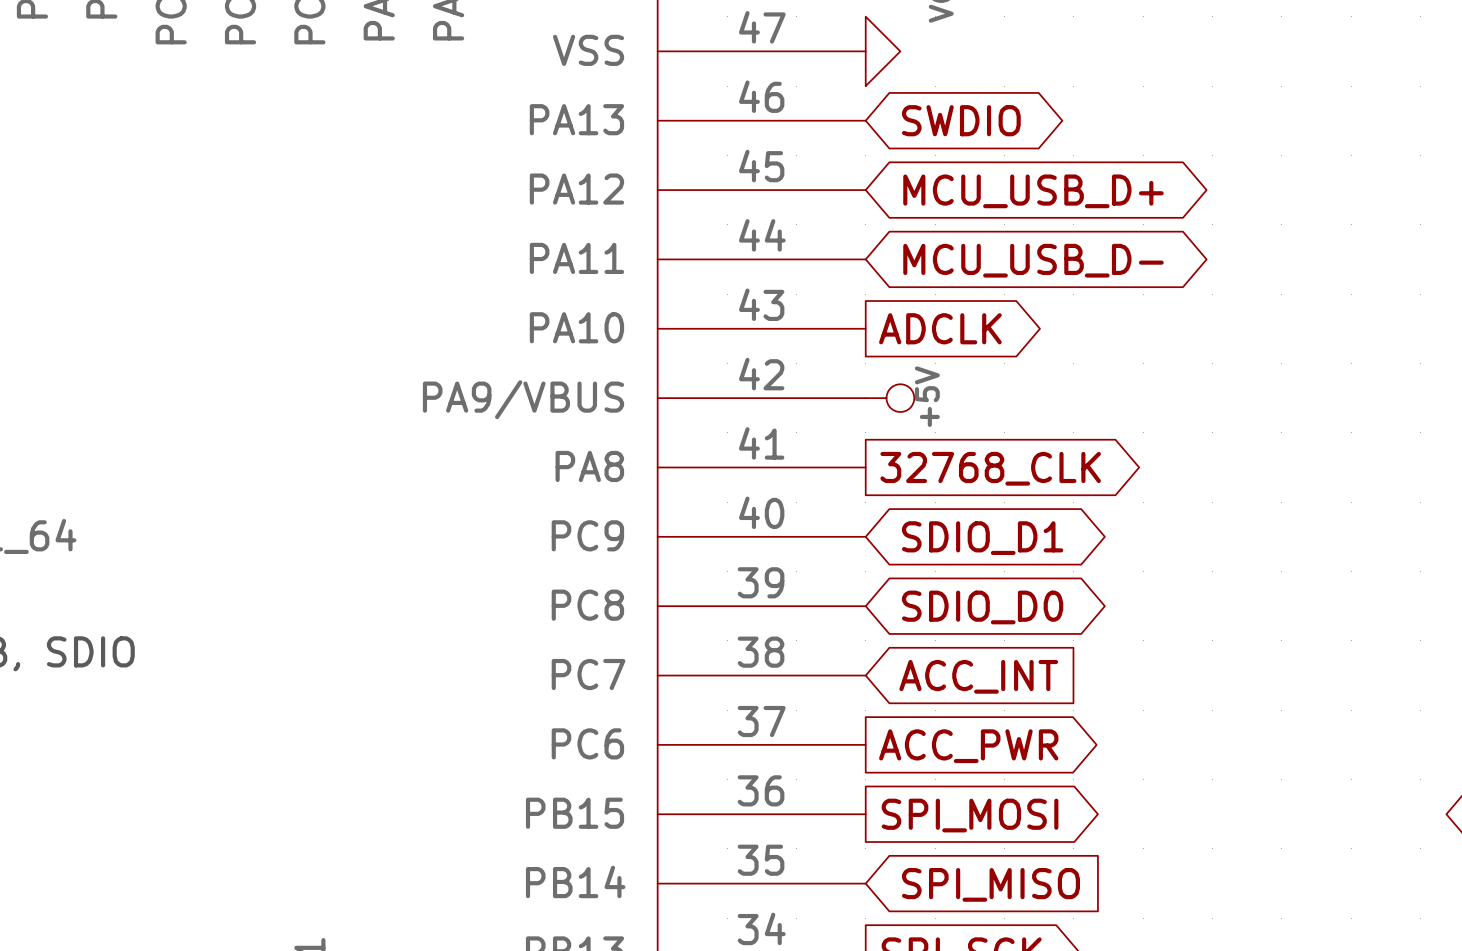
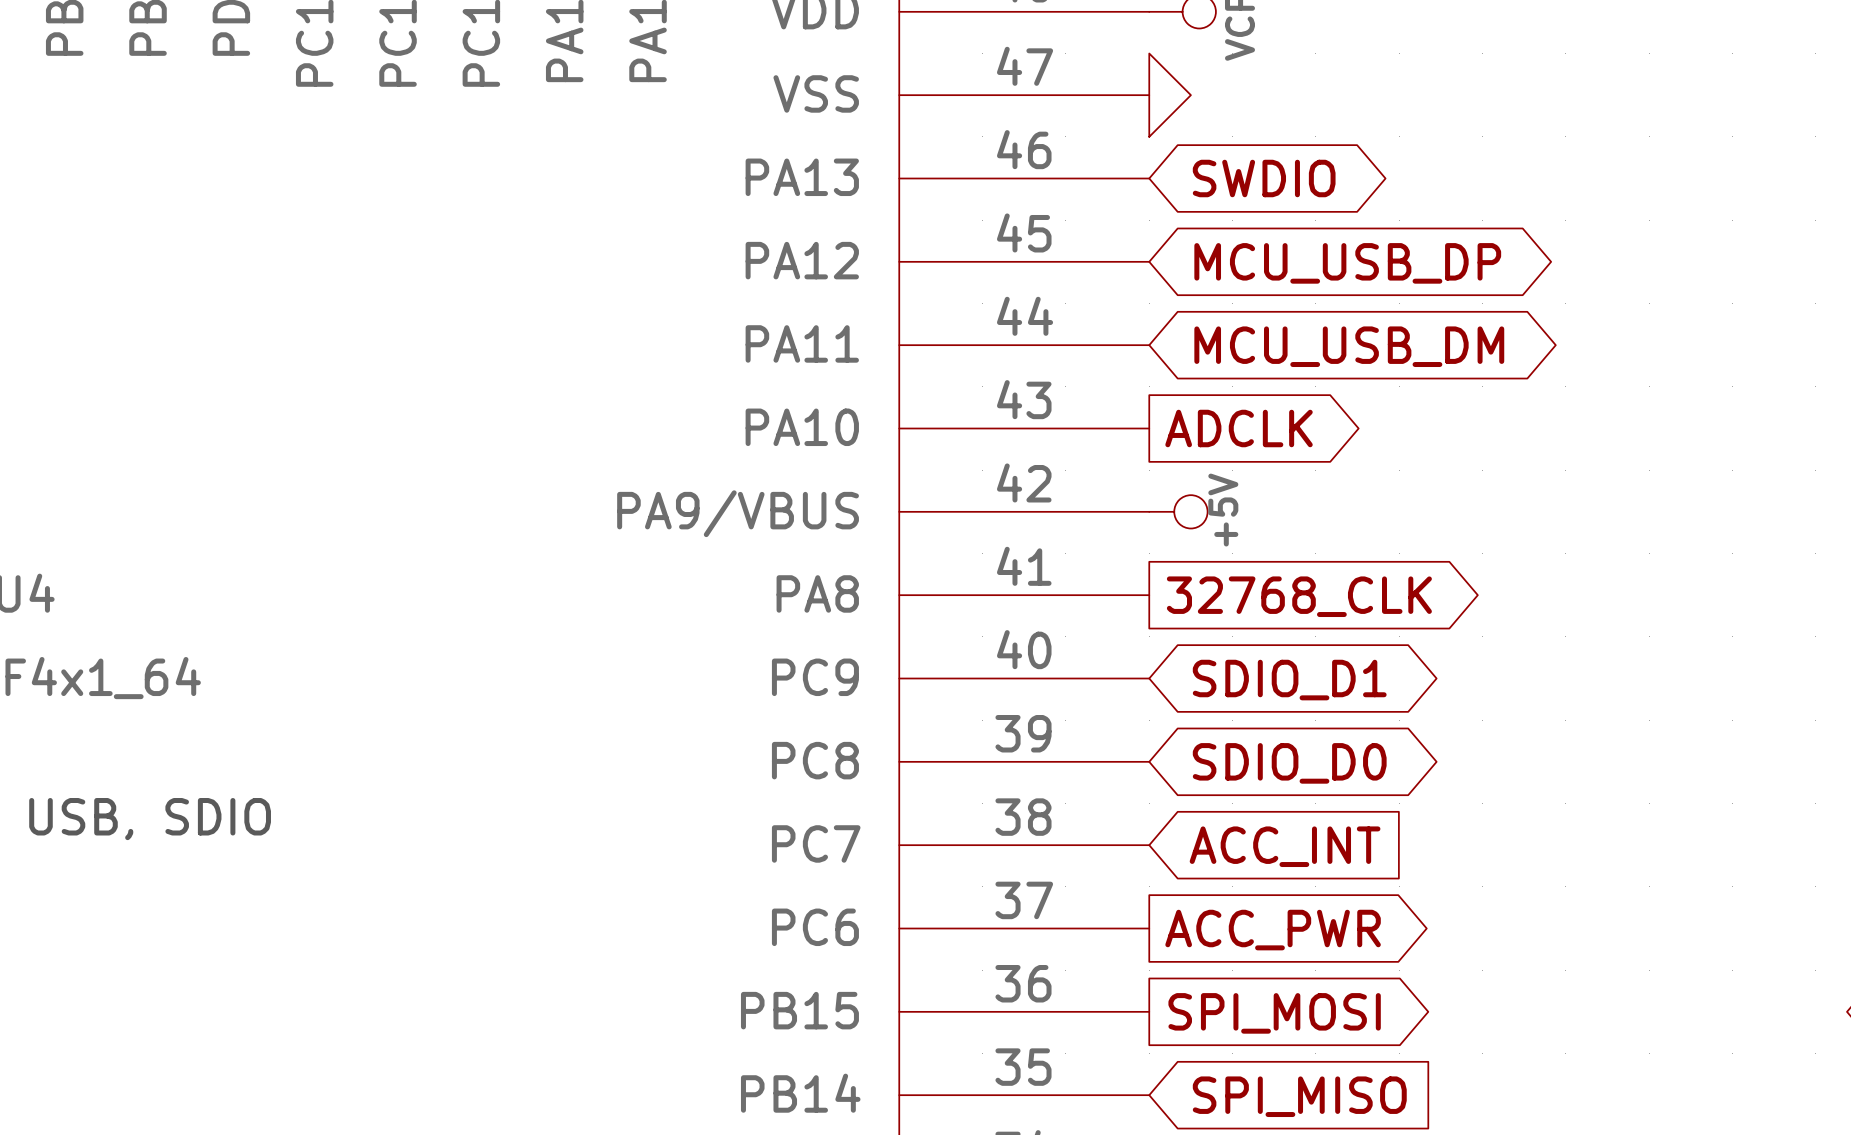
global label: MCU_USB_D+ (1033, 191) -> MCU_USB_DP (1347, 263)
global label: MCU_USB_D- (1033, 260) -> MCU_USB_DM (1349, 346)

